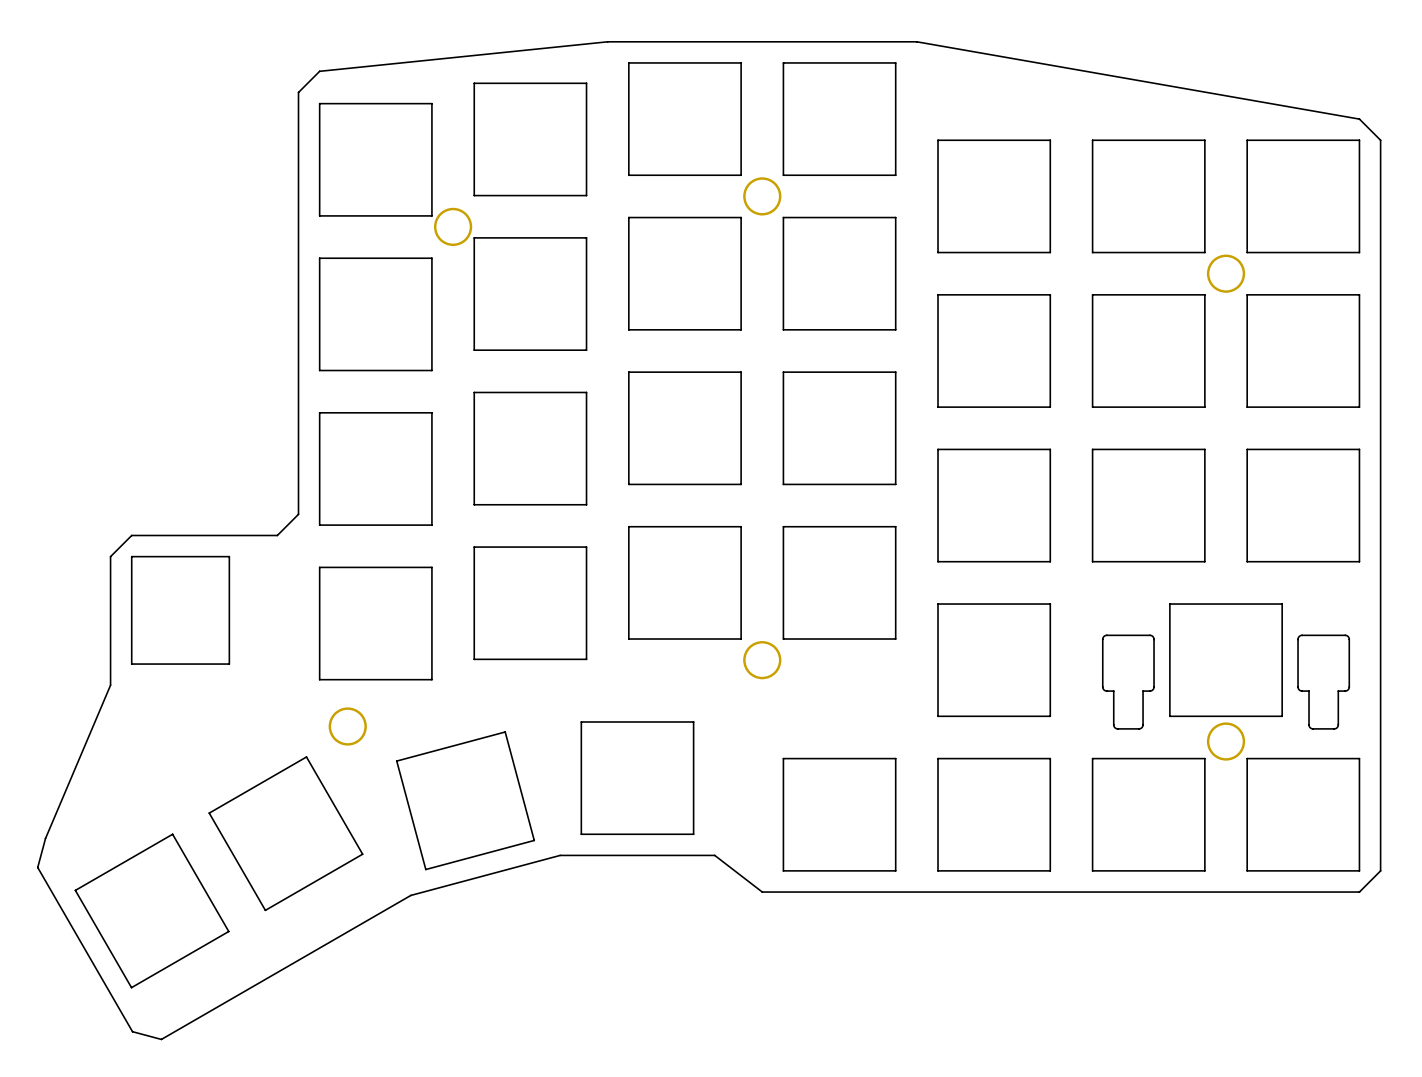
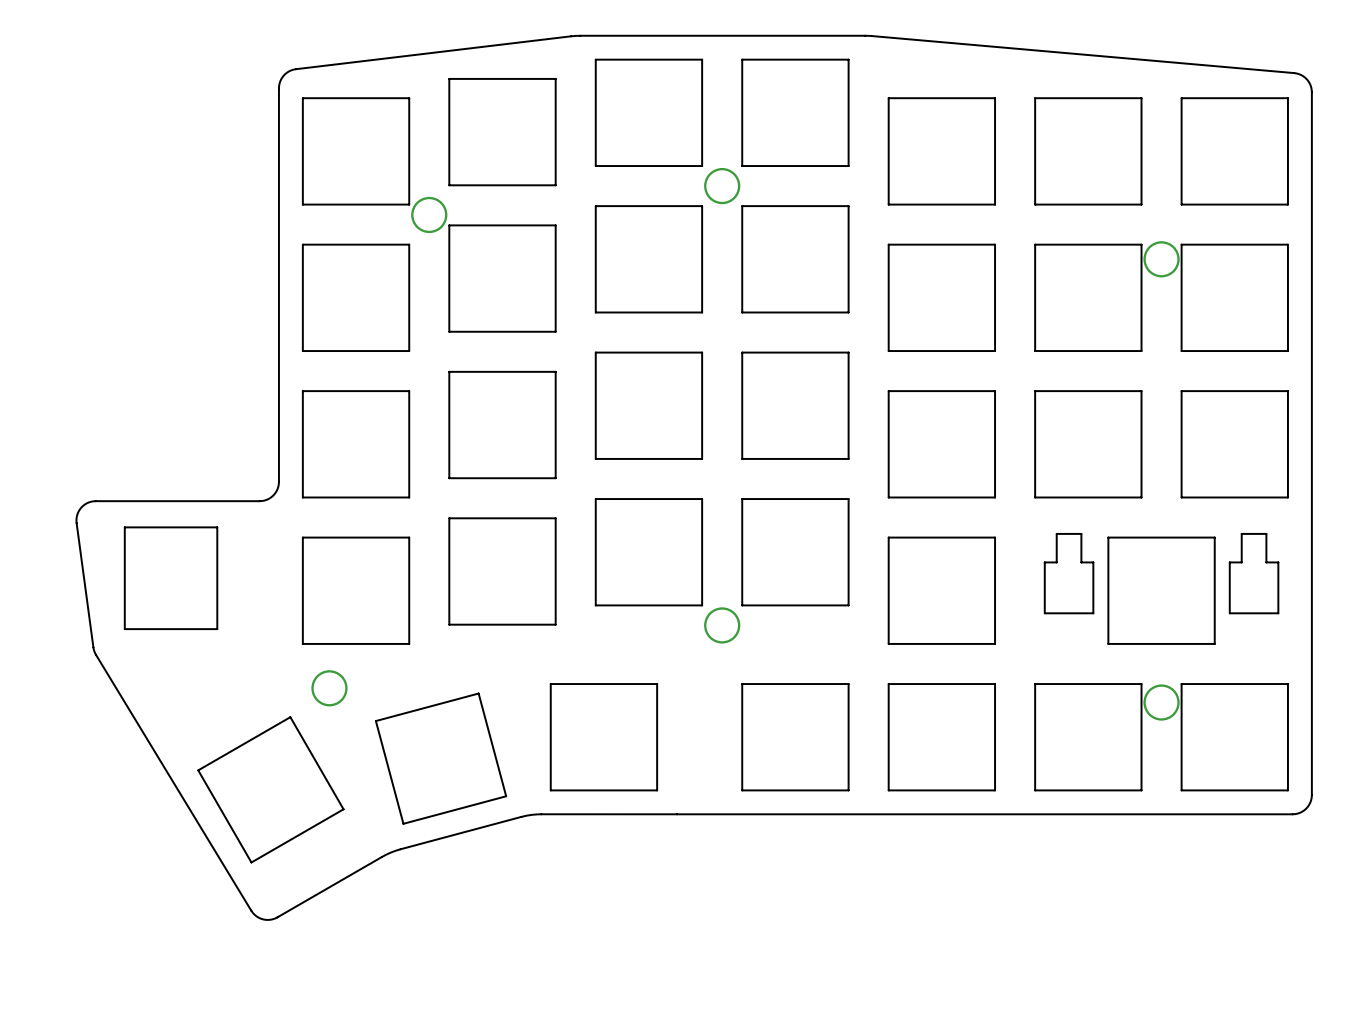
board edge: (916, 41) (607, 41) (319, 71) (298, 92) (298, 514) (277, 535) (131, 535) (110, 556) (110, 685) (45, 838) (37, 867) (132, 1031) (161, 1039) (410, 895) (560, 855) (714, 855) (762, 892) (1359, 892) (1380, 870) (1380, 140) (1359, 119) (916, 41) -> (865, 35) (1294, 73) (1303, 76) (1309, 83) (1311, 92) (1311, 795) (1307, 806) (1302, 811) (1292, 814) (531, 814) (395, 850) (275, 918) (265, 919) (256, 916) (95, 653) (76, 520) (81, 507) (93, 501) (259, 501) (271, 497) (277, 489) (278, 88) (282, 77) (289, 71) (295, 69) (575, 35) (865, 35)
board edge: (1050, 140) (938, 140) -> (995, 132) (995, 98) (888, 98) (888, 132)
board edge: (1204, 140) (1092, 140) -> (1141, 132) (1141, 98) (1035, 98) (1035, 132)
board edge: (1359, 140) (1247, 140) -> (1287, 132) (1287, 98) (1181, 98) (1181, 132)
board edge: (1050, 215) (1050, 252) (938, 252) (938, 215) -> (995, 204) (888, 204)
board edge: (1204, 215) (1204, 252) (1092, 252) (1092, 215) -> (1141, 204) (1035, 204)
board edge: (1359, 215) (1359, 252) (1247, 252) (1247, 215) -> (1287, 204) (1181, 204)
board edge: (1050, 294) (938, 294) -> (995, 279) (995, 244) (888, 244) (888, 279)
board edge: (1204, 294) (1092, 294) -> (1141, 279) (1141, 244) (1035, 244) (1035, 279)
board edge: (1359, 294) (1247, 294) -> (1287, 279) (1287, 244) (1181, 244) (1181, 279)
board edge: (1050, 370) (1050, 407) (938, 407) (938, 370) -> (995, 351) (888, 351)
board edge: (1204, 370) (1204, 407) (1092, 407) (1092, 370) -> (1141, 351) (1035, 351)
board edge: (1359, 370) (1359, 407) (1247, 407) (1247, 370) -> (1287, 351) (1181, 351)
board edge: (1050, 449) (938, 449) -> (995, 425) (995, 391) (888, 391) (888, 425)
board edge: (1204, 449) (1092, 449) -> (1141, 425) (1141, 391) (1035, 391) (1035, 425)
board edge: (1359, 449) (1247, 449) -> (1287, 425) (1287, 391) (1181, 391) (1181, 425)
board edge: (1050, 525) (1050, 561) (938, 561) (938, 525) -> (995, 497) (888, 497)
board edge: (1204, 525) (1204, 561) (1092, 561) (1092, 525) -> (1141, 497) (1035, 497)
board edge: (1359, 525) (1359, 561) (1247, 561) (1247, 525) -> (1287, 497) (1181, 497)
board edge: (1050, 604) (938, 604) -> (995, 572) (995, 537) (888, 537) (888, 572)
board edge: (1282, 604) (1169, 604) -> (1214, 572) (1214, 537) (1108, 537) (1108, 572)
board edge: (1154, 639) (1149, 635) (1106, 635) (1102, 639) -> (1093, 605) (1093, 562) (1081, 562) (1081, 533) (1056, 533) (1056, 562) (1044, 562) (1044, 605)
board edge: (1349, 639) (1345, 635) (1301, 635) (1298, 639) -> (1278, 605) (1278, 562) (1266, 562) (1266, 533) (1241, 533) (1241, 562) (1229, 562) (1229, 605)
board edge: (1154, 647) (1153, 687) (1151, 690) (1143, 691) (1143, 725) (1138, 728) (1117, 728) (1114, 726) (1113, 691) (1105, 690) (1102, 687) (1102, 647) -> (1093, 613) (1044, 613)
board edge: (1349, 647) (1349, 687) (1346, 690) (1338, 691) (1338, 725) (1334, 728) (1312, 728) (1309, 726) (1309, 691) (1301, 690) (1298, 687) (1298, 647) -> (1278, 613) (1229, 613)
board edge: (1050, 679) (1050, 716) (938, 716) (938, 679) -> (995, 643) (888, 643)
board edge: (1282, 679) (1282, 716) (1169, 716) (1169, 679) -> (1214, 643) (1108, 643)
board edge: (895, 758) (783, 758) -> (848, 718) (848, 684) (742, 684) (742, 718)
board edge: (1050, 758) (938, 758) -> (995, 718) (995, 684) (888, 684) (888, 718)
board edge: (1204, 758) (1092, 758) -> (1141, 718) (1141, 684) (1035, 684) (1035, 718)
board edge: (1359, 758) (1247, 758) -> (1287, 718) (1287, 684) (1181, 684) (1181, 718)
board edge: (172, 834) (75, 890) (131, 987) (228, 931) (172, 834) -> none
board edge: (895, 834) (895, 870) (783, 870) (783, 834) -> (848, 790) (742, 790)
board edge: (1050, 834) (1050, 870) (938, 870) (938, 834) -> (995, 790) (888, 790)
board edge: (1204, 834) (1204, 870) (1092, 870) (1092, 834) -> (1141, 790) (1035, 790)
board edge: (1359, 834) (1359, 870) (1247, 870) (1247, 834) -> (1287, 790) (1181, 790)

